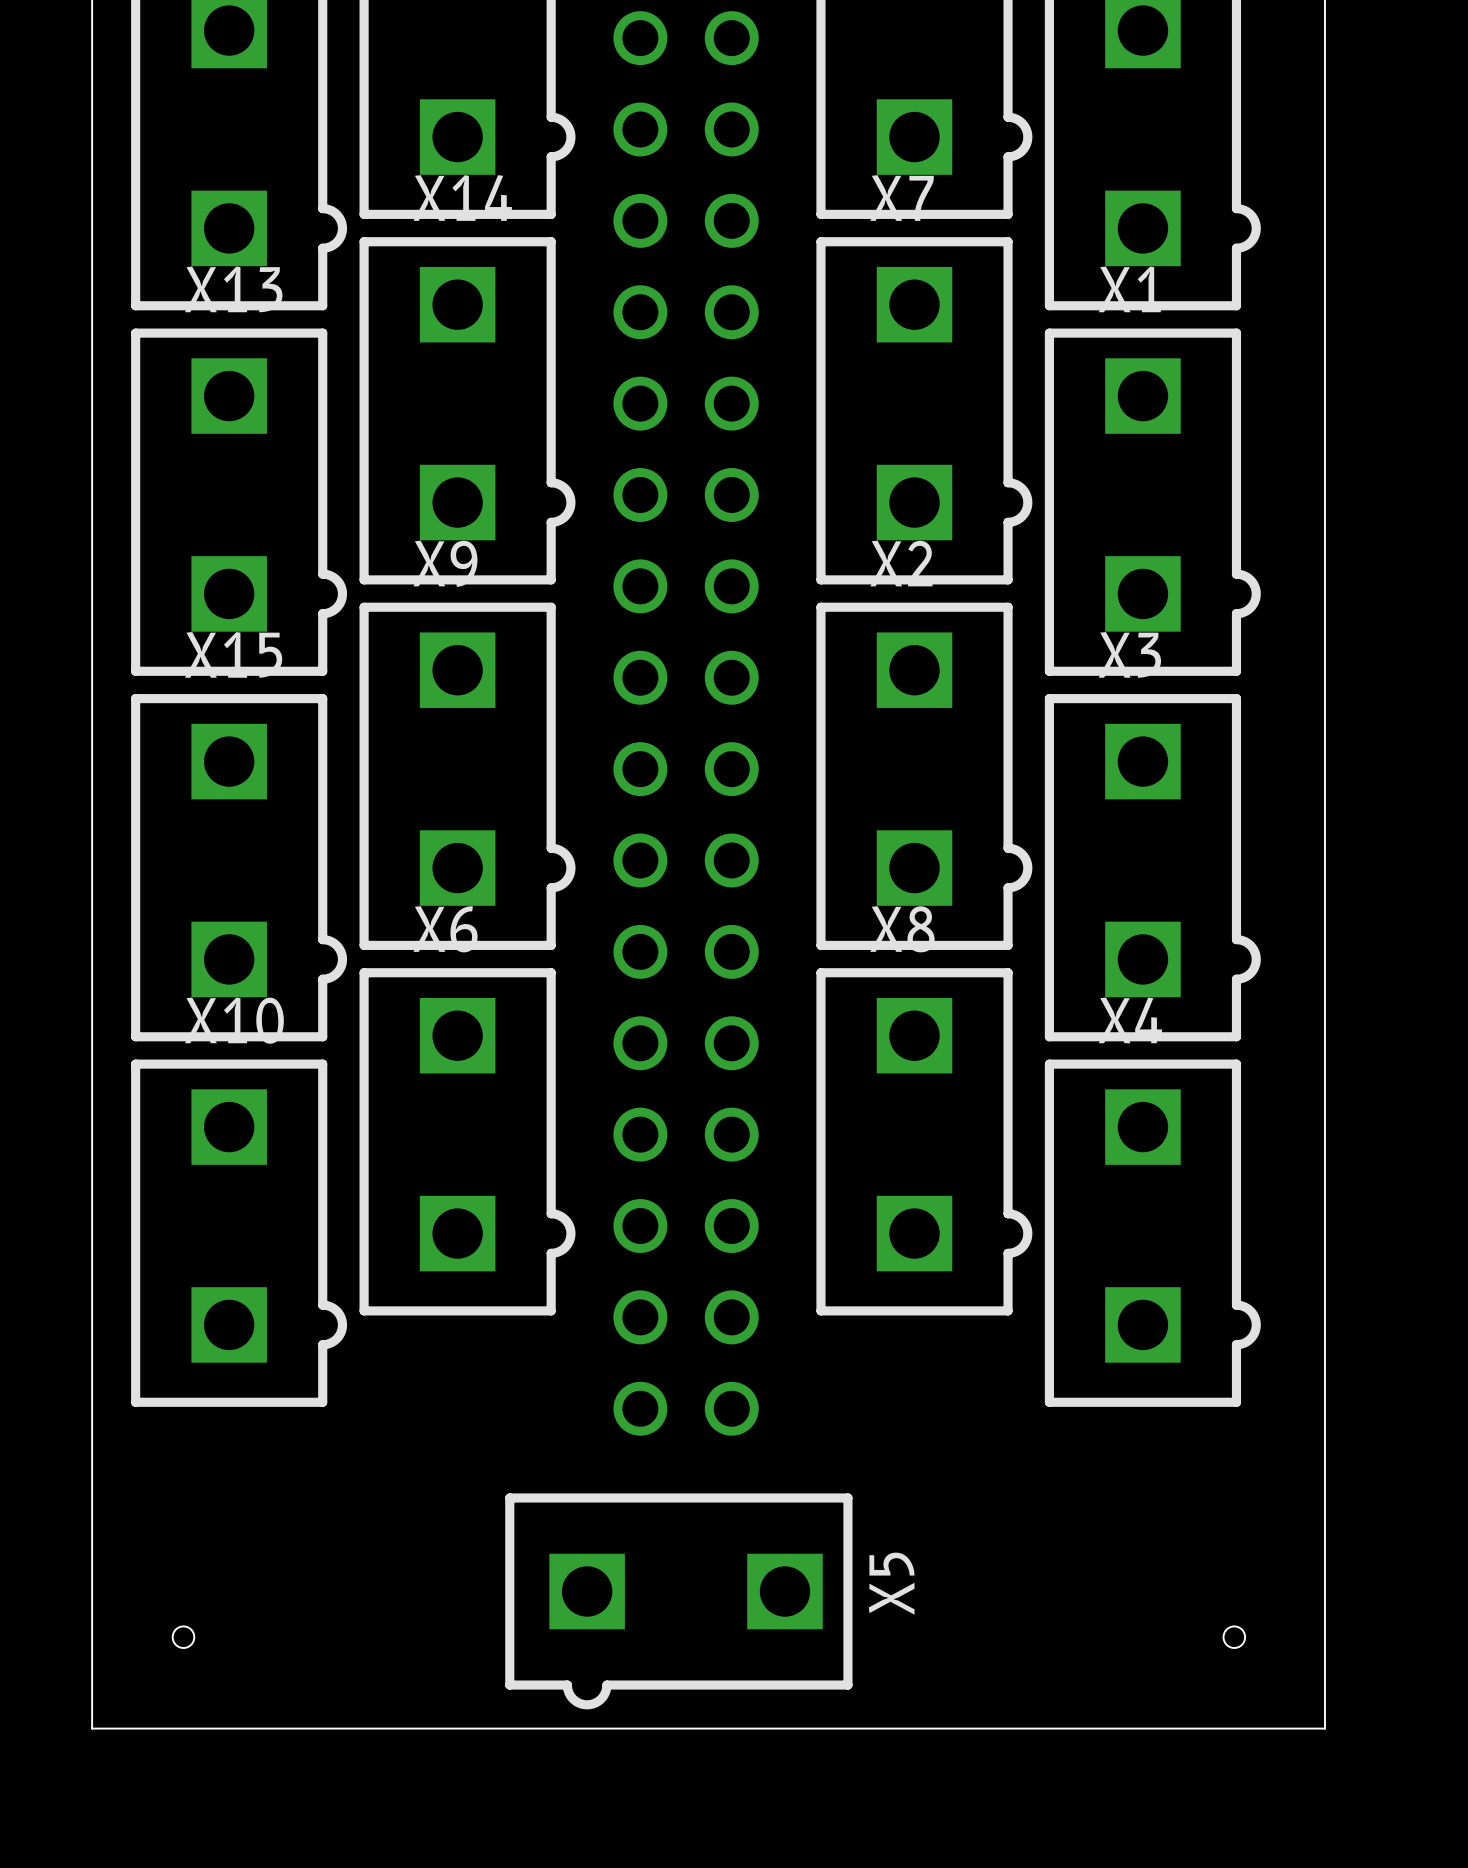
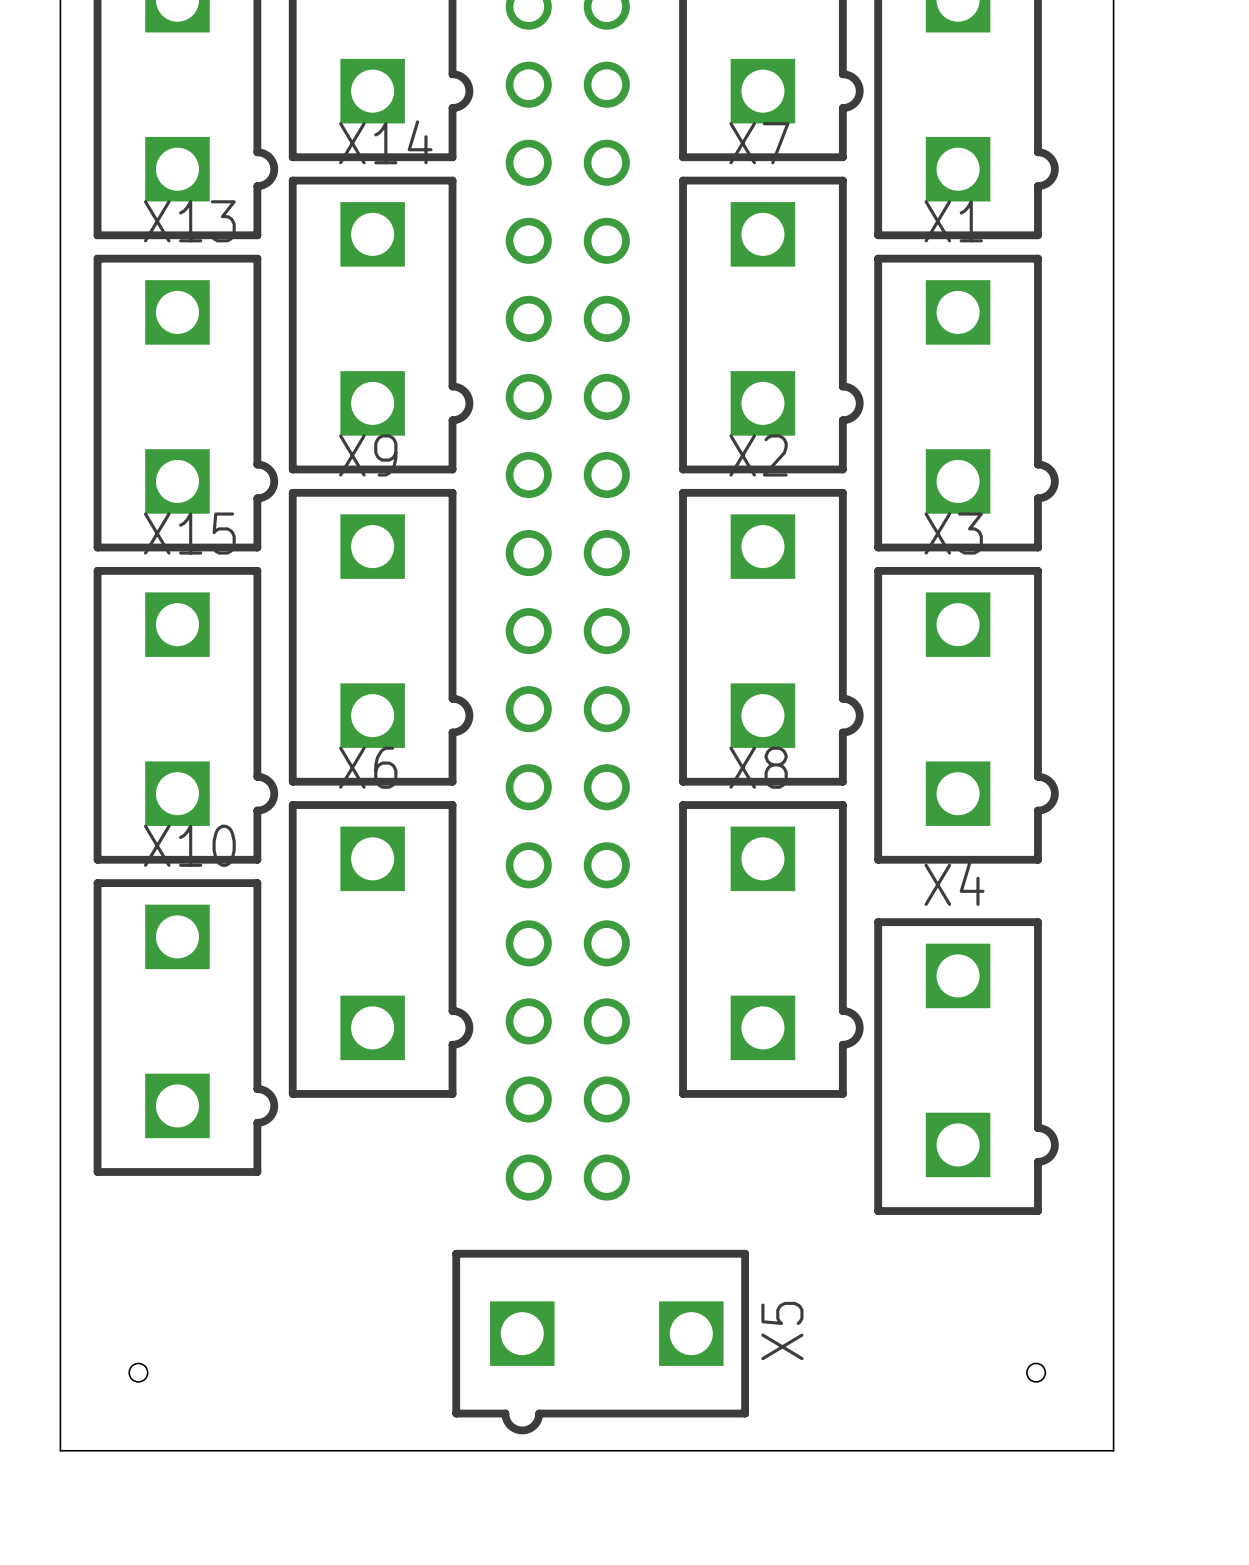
X4 position: (1152, 1233) -> (966, 1066)
X5 position: (678, 1601) -> (600, 1342)

